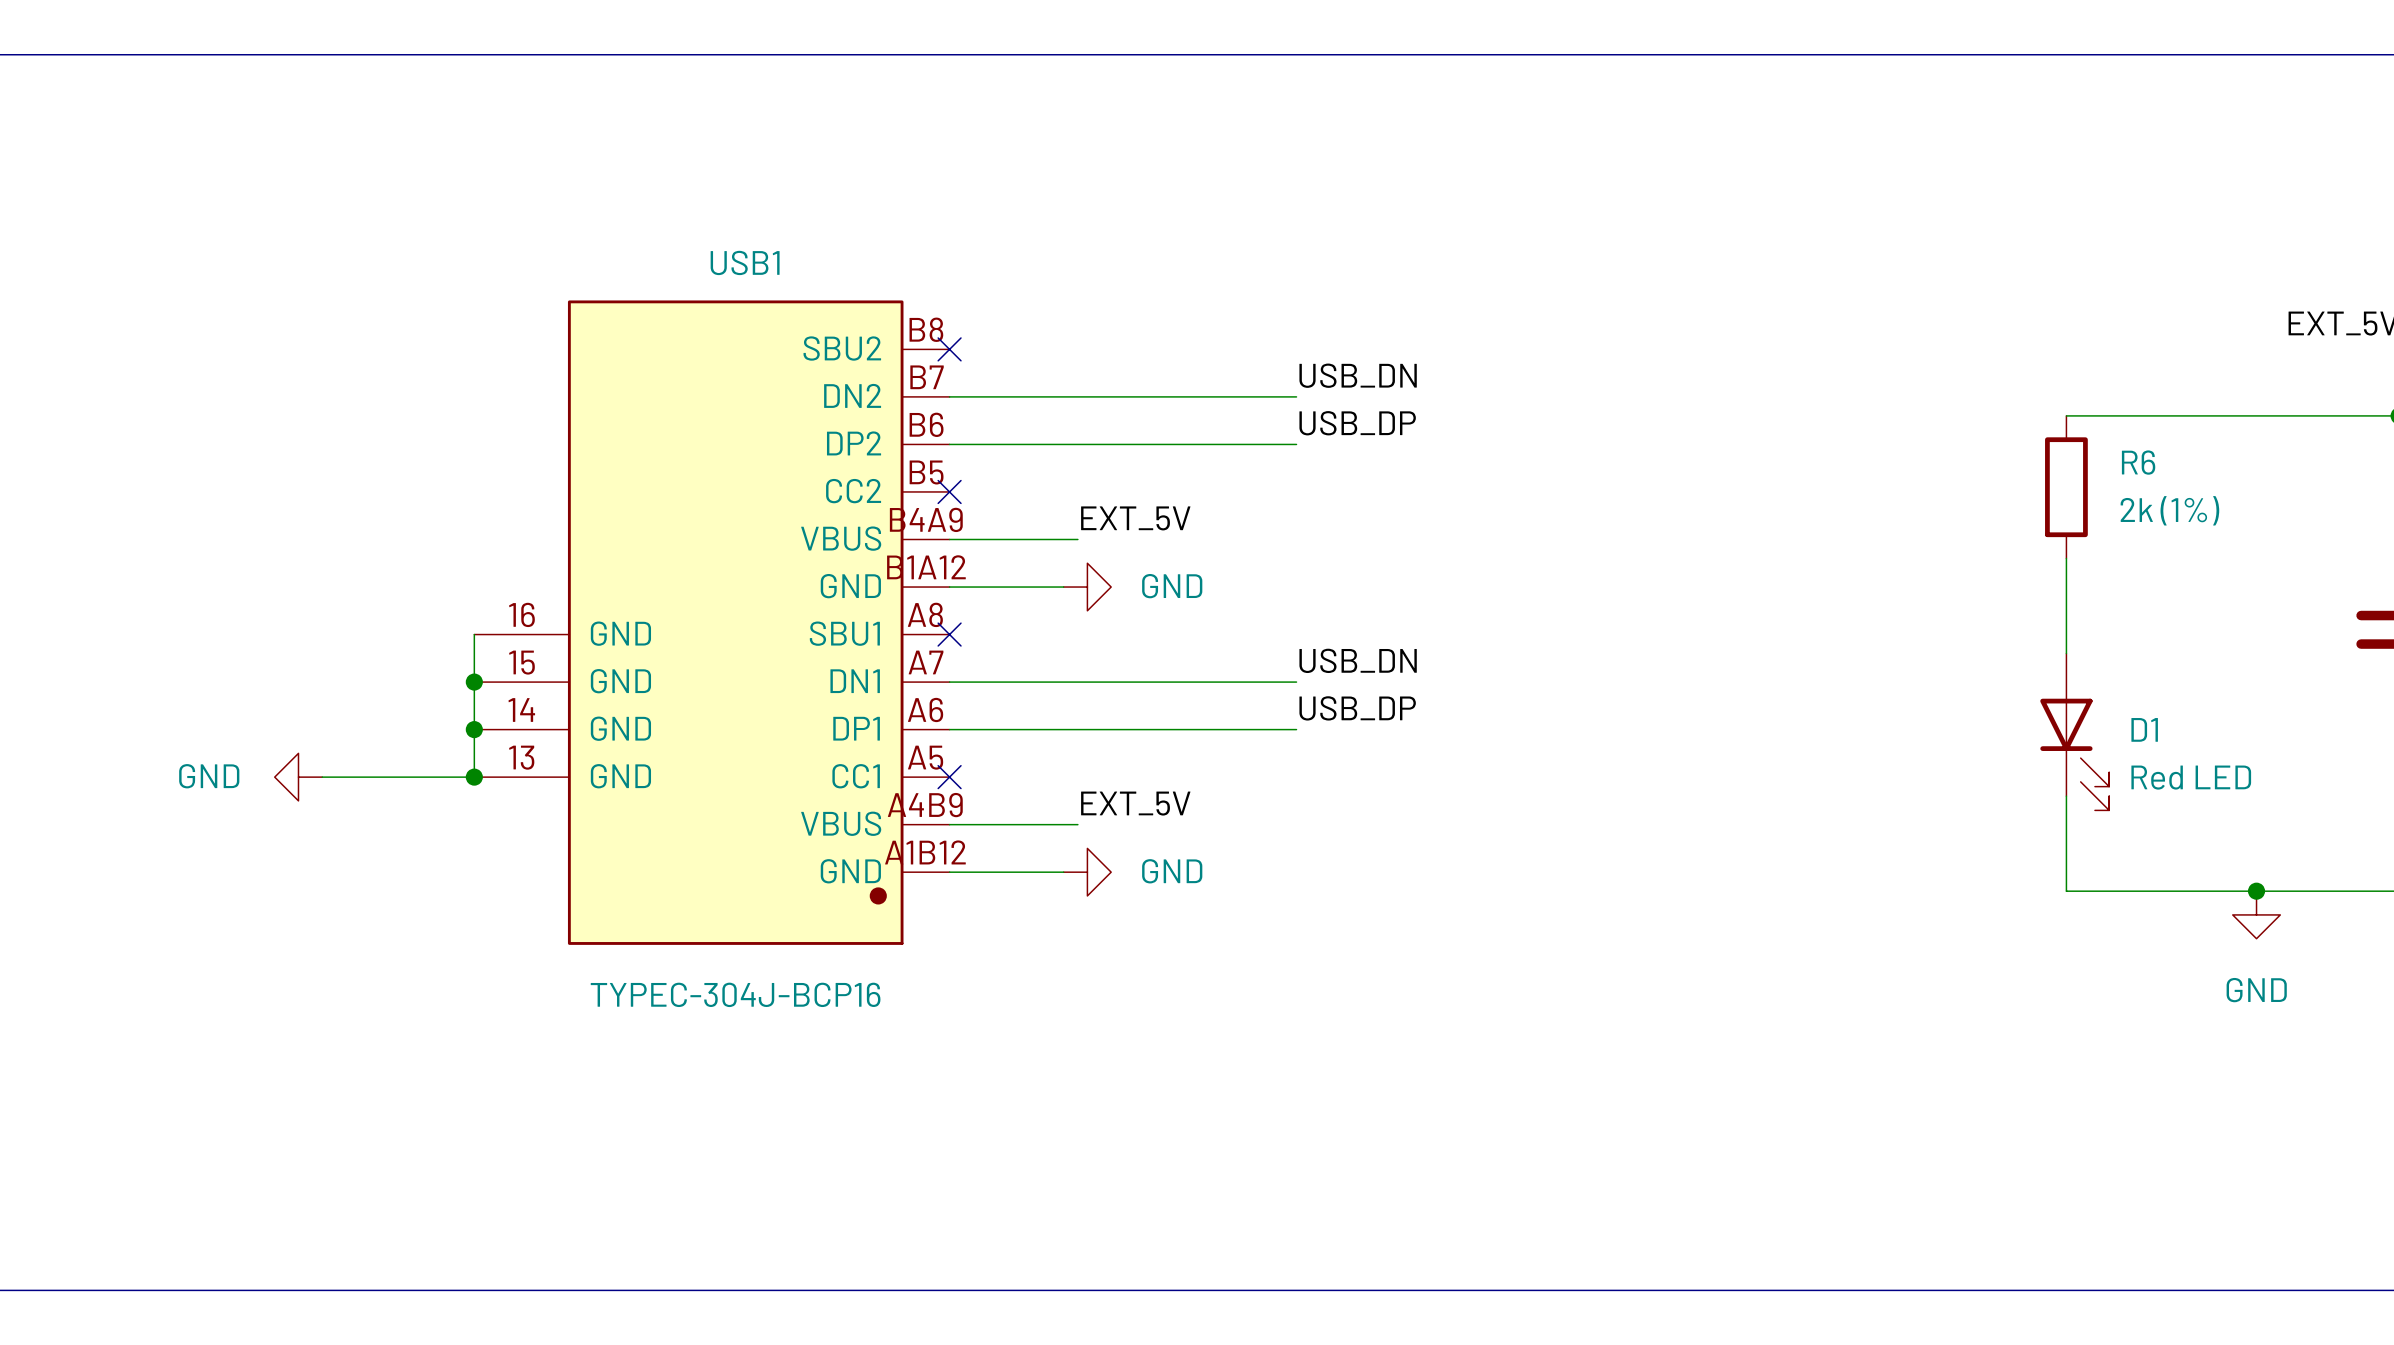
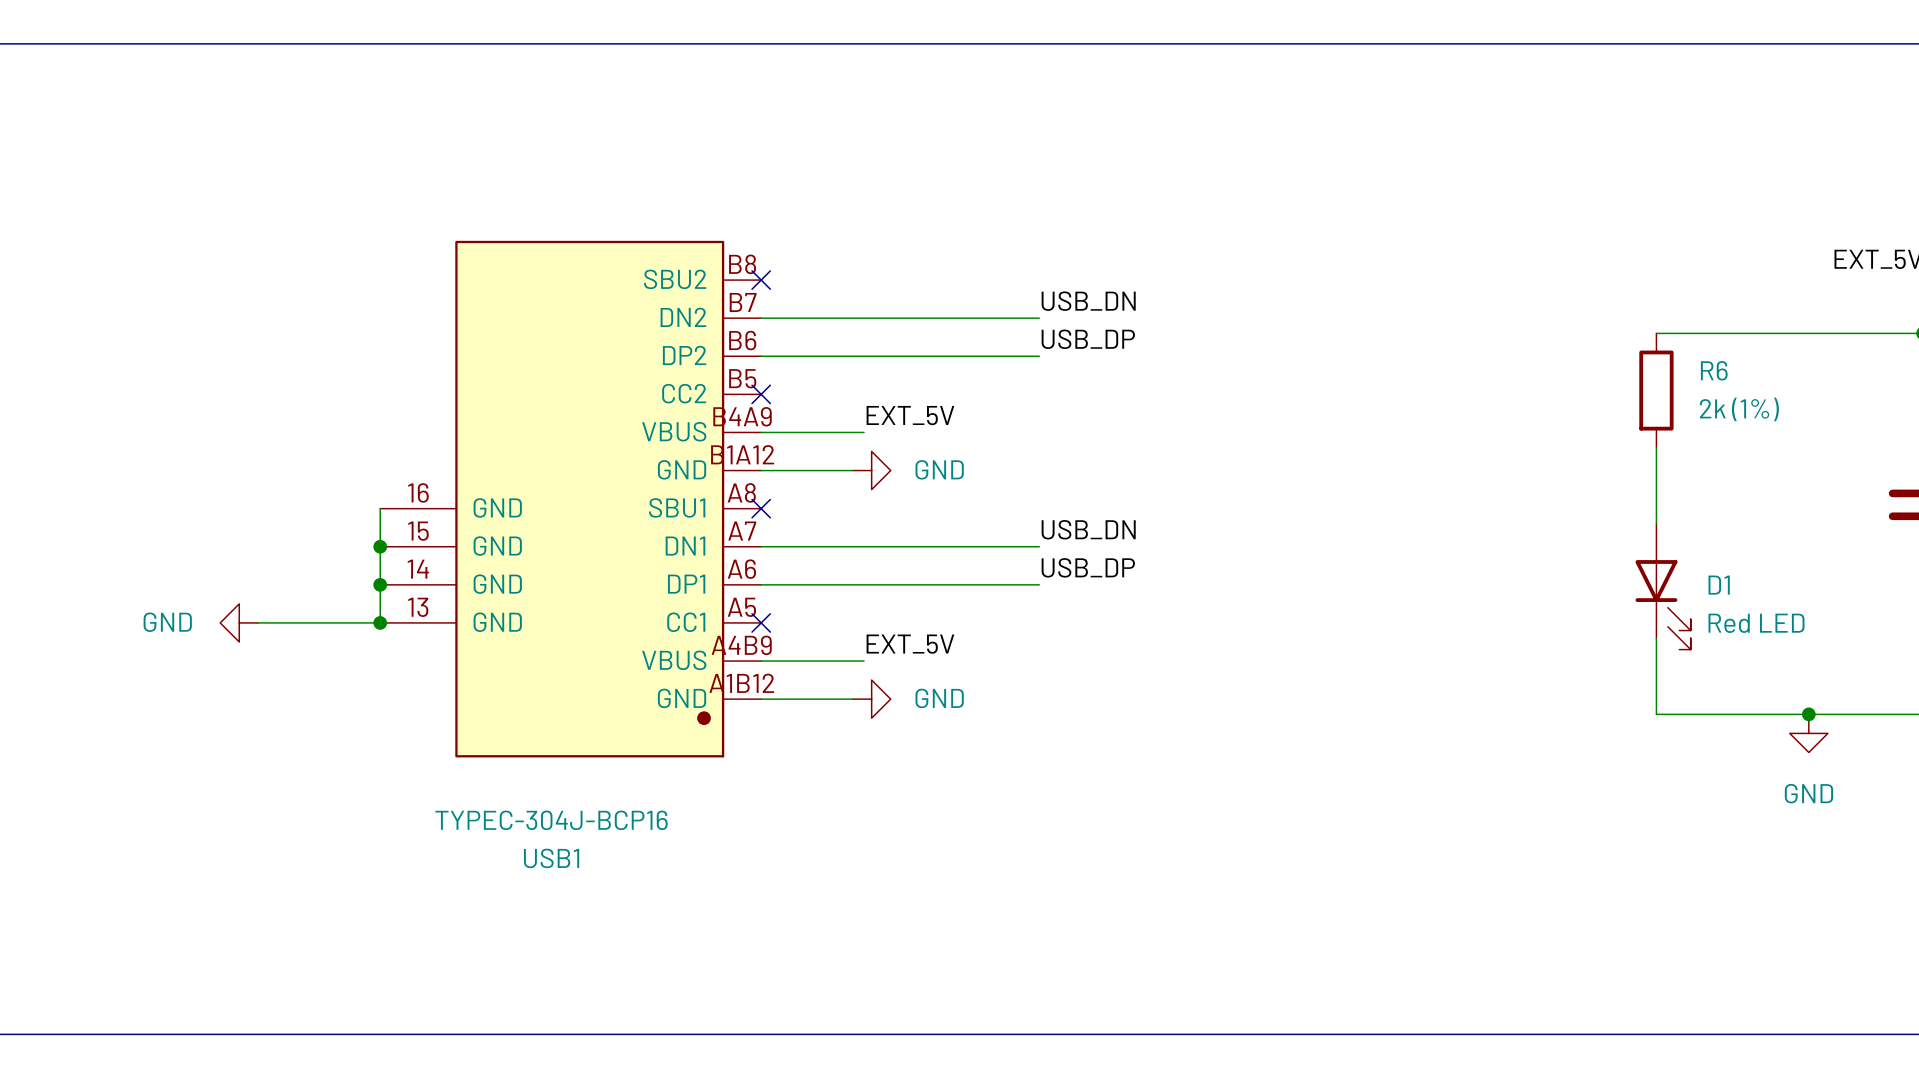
USB1 name position: USB1 (745, 262) -> USB1 (551, 858)
USB1 value position: TYPEC-304J-BCP16 (735, 994) -> TYPEC-304J-BCP16 (551, 820)

